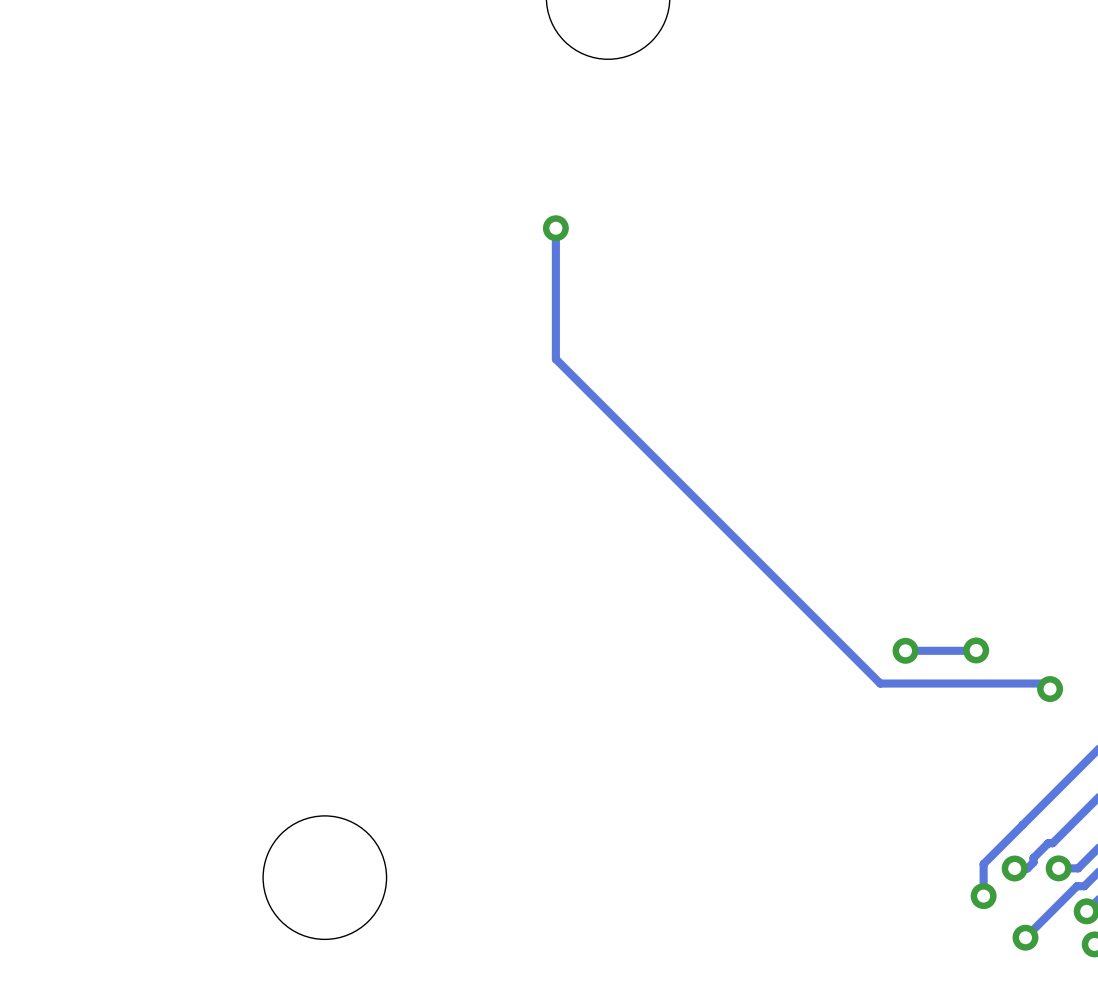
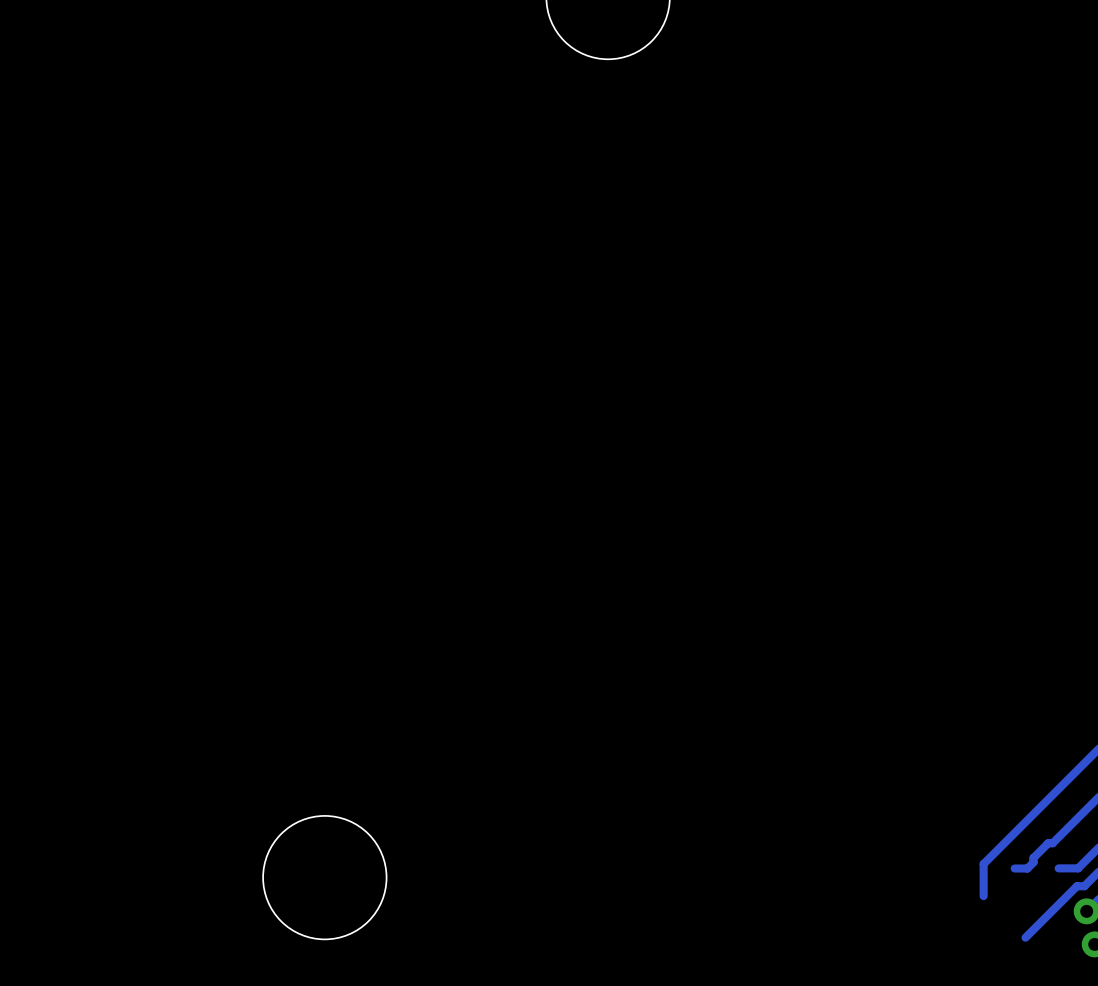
track: (555, 228) (555, 359) (880, 683) (1044, 683) (1050, 689) -> none
via: (555, 228) -> none
via: (905, 650) -> none
track: (975, 650) (905, 650) -> none
via: (976, 650) -> none
via: (1050, 689) -> none
via: (1014, 868) -> none
via: (1058, 868) -> none
via: (983, 896) -> none
via: (1025, 937) -> none

